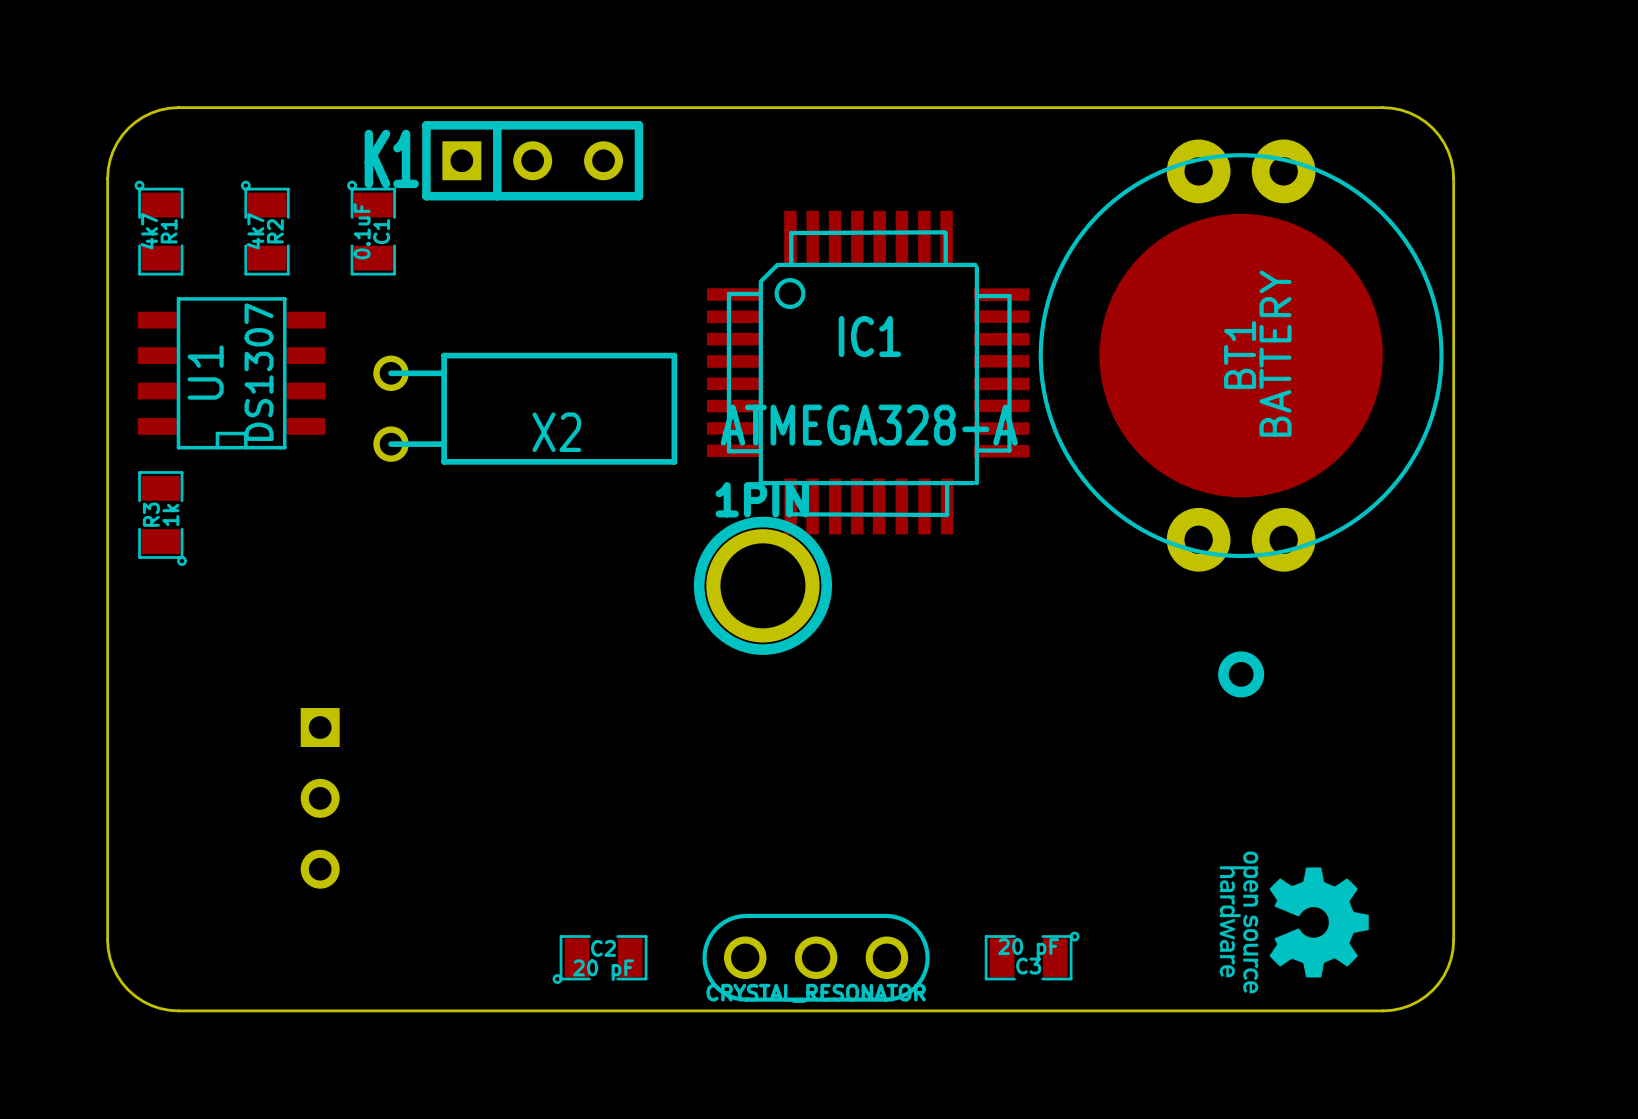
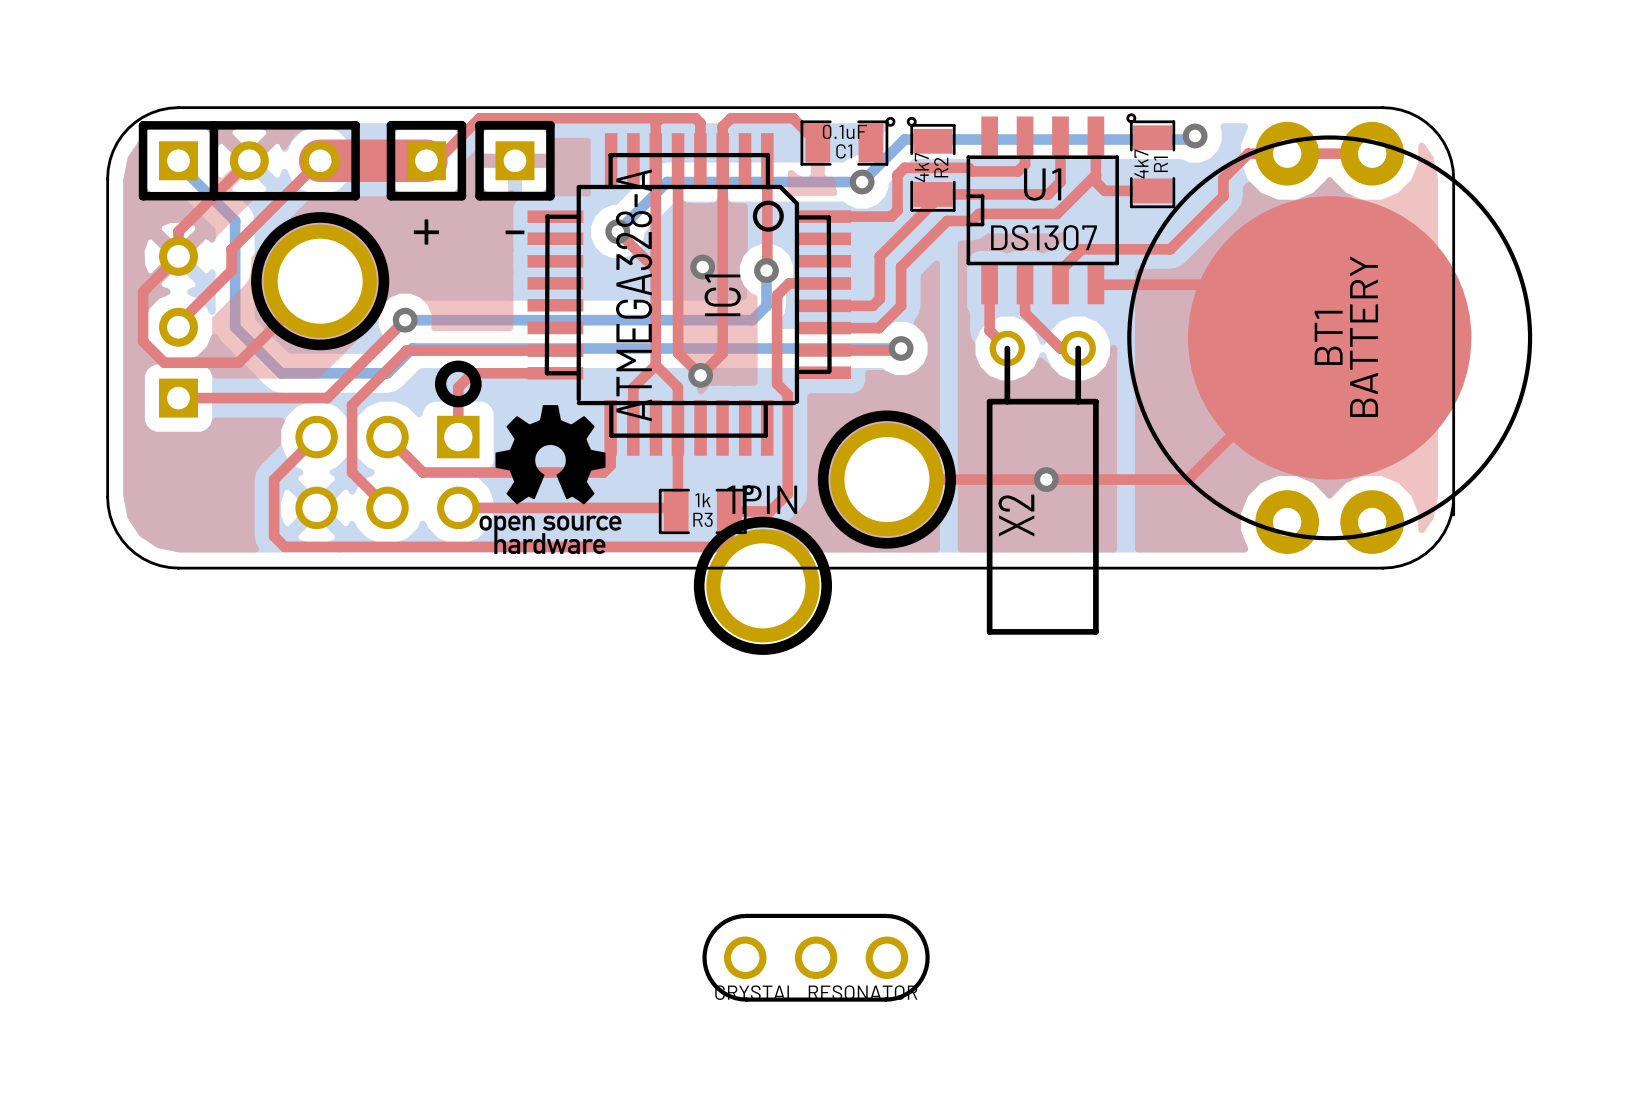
top track: none -> (660, 118) (655, 122) (655, 365)
top track: none -> (1025, 135) (1025, 164) (1017, 171) (971, 171) (968, 167) (904, 167) (897, 174) (897, 210) (891, 216) (823, 216)
top track: none -> (1060, 135) (1060, 182) (1048, 194) (932, 194) (932, 203) (879, 256) (879, 298) (872, 305) (823, 305)
top track: none -> (1095, 135) (1095, 182) (1104, 190) (1152, 190)
bottom track: none -> (1195, 135) (1191, 139) (904, 139) (862, 182) (667, 182) (617, 231)
via: none -> (1195, 135)
top track: none -> (817, 143) (793, 118) (731, 118) (722, 126) (722, 353) (700, 375) (678, 352) (678, 161)
top track: none -> (1372, 153) (1248, 153) (1223, 178) (1223, 196) (1170, 249) (1081, 249) (1060, 270) (1060, 284)
bottom track: none -> (178, 160) (178, 164) (235, 220) (235, 327) (281, 373) (387, 373) (412, 348) (901, 348)
top track: none -> (249, 160) (178, 231) (178, 256) (143, 291) (143, 341) (164, 362) (238, 362) (320, 281)
part: none -> (249, 160)
part: none -> (426, 160)
part: none -> (514, 160)
K1: (532, 160) -> none
top track: none -> (700, 161) (700, 123) (695, 118) (479, 118) (437, 160) (320, 160) (231, 249) (231, 270) (178, 323) (178, 327)
top track: none -> (767, 161) (766, 270)
top track: none -> (1095, 174) (1056, 213) (979, 213) (971, 220) (947, 220) (901, 267) (901, 306) (878, 328) (823, 328)
via: none -> (862, 182)
R1 position: (159, 228) -> (1150, 160)
R2 position: (265, 228) -> (931, 164)
C1 rotation: 0° (371, 228) -> 90° clockwise (847, 141)
C1 position: (371, 228) -> (847, 141)
top track: none -> (617, 231) (655, 269)
via: none -> (617, 231)
text: none -> + (426, 232)
text: none -> - (514, 232)
via: none -> (702, 267)
bottom track: none -> (766, 270) (766, 306) (752, 320) (405, 320)
via: none -> (766, 270)
part: none -> (320, 281)
top track: none -> (823, 283) (789, 283) (777, 295) (777, 383) (787, 394) (787, 493) (770, 511) (729, 511) (729, 541) (723, 546) (284, 546) (274, 536) (274, 479) (316, 437)
top track: none -> (989, 284) (989, 330) (1007, 348)
top track: none -> (1025, 284) (1025, 313) (1060, 348) (1078, 348)
top track: none -> (1095, 284) (1276, 284) (1329, 337) (1188, 479) (886, 479)
top track: none -> (405, 320) (327, 398) (178, 398)
via: none -> (405, 320)
top track: none -> (901, 348) (899, 350) (823, 350)
via: none -> (901, 348)
top track: none -> (555, 350) (406, 350) (352, 405) (352, 472) (387, 507)
BT1 position: (1241, 355) -> (1329, 337)
top track: none -> (655, 365) (633, 387) (633, 427)
top track: none -> (655, 365) (677, 387) (677, 509) (676, 511) (672, 507) (458, 507)
IC1 rotation: 0° (868, 372) -> 90° clockwise (689, 294)
IC1 position: (868, 372) -> (689, 294)
U1 rotation: 0° (231, 373) -> 90° clockwise (1042, 210)
U1 position: (231, 373) -> (1042, 210)
top track: none -> (555, 373) (472, 373) (458, 387) (458, 437)
via: none -> (700, 375)
drawing: none -> [479, 405, 622, 555]
X2 rotation: 0° (525, 408) -> 90° clockwise (1042, 482)
X2 position: (525, 408) -> (1042, 482)
top track: none -> (610, 427) (610, 465) (603, 472) (422, 472) (387, 437)
part: none -> (388, 444)
part: none -> (886, 479)
via: none -> (1046, 479)
board edge: (107, 497) (108, 949) (113, 967) (128, 990) (151, 1005) (178, 1010) (1382, 1010) (1409, 1005) (1425, 996) (1439, 983) (1448, 967) (1453, 949) (1453, 514) -> (107, 497) (113, 524) (128, 547) (151, 562) (178, 568) (1382, 568) (1409, 562) (1432, 547) (1448, 524) (1453, 497)
R3 rotation: 0° (162, 518) -> 90° counterclockwise (706, 509)
R3 position: (162, 518) -> (706, 509)
drawing: [1218, 651, 1265, 698] -> none
part rotation: 0° (320, 798) -> 180° (178, 327)
part position: (320, 798) -> (178, 327)
drawing: [1219, 851, 1369, 994] -> none
C3: 20 pF (1032, 955) -> none
C2: 20 pF (600, 959) -> none

